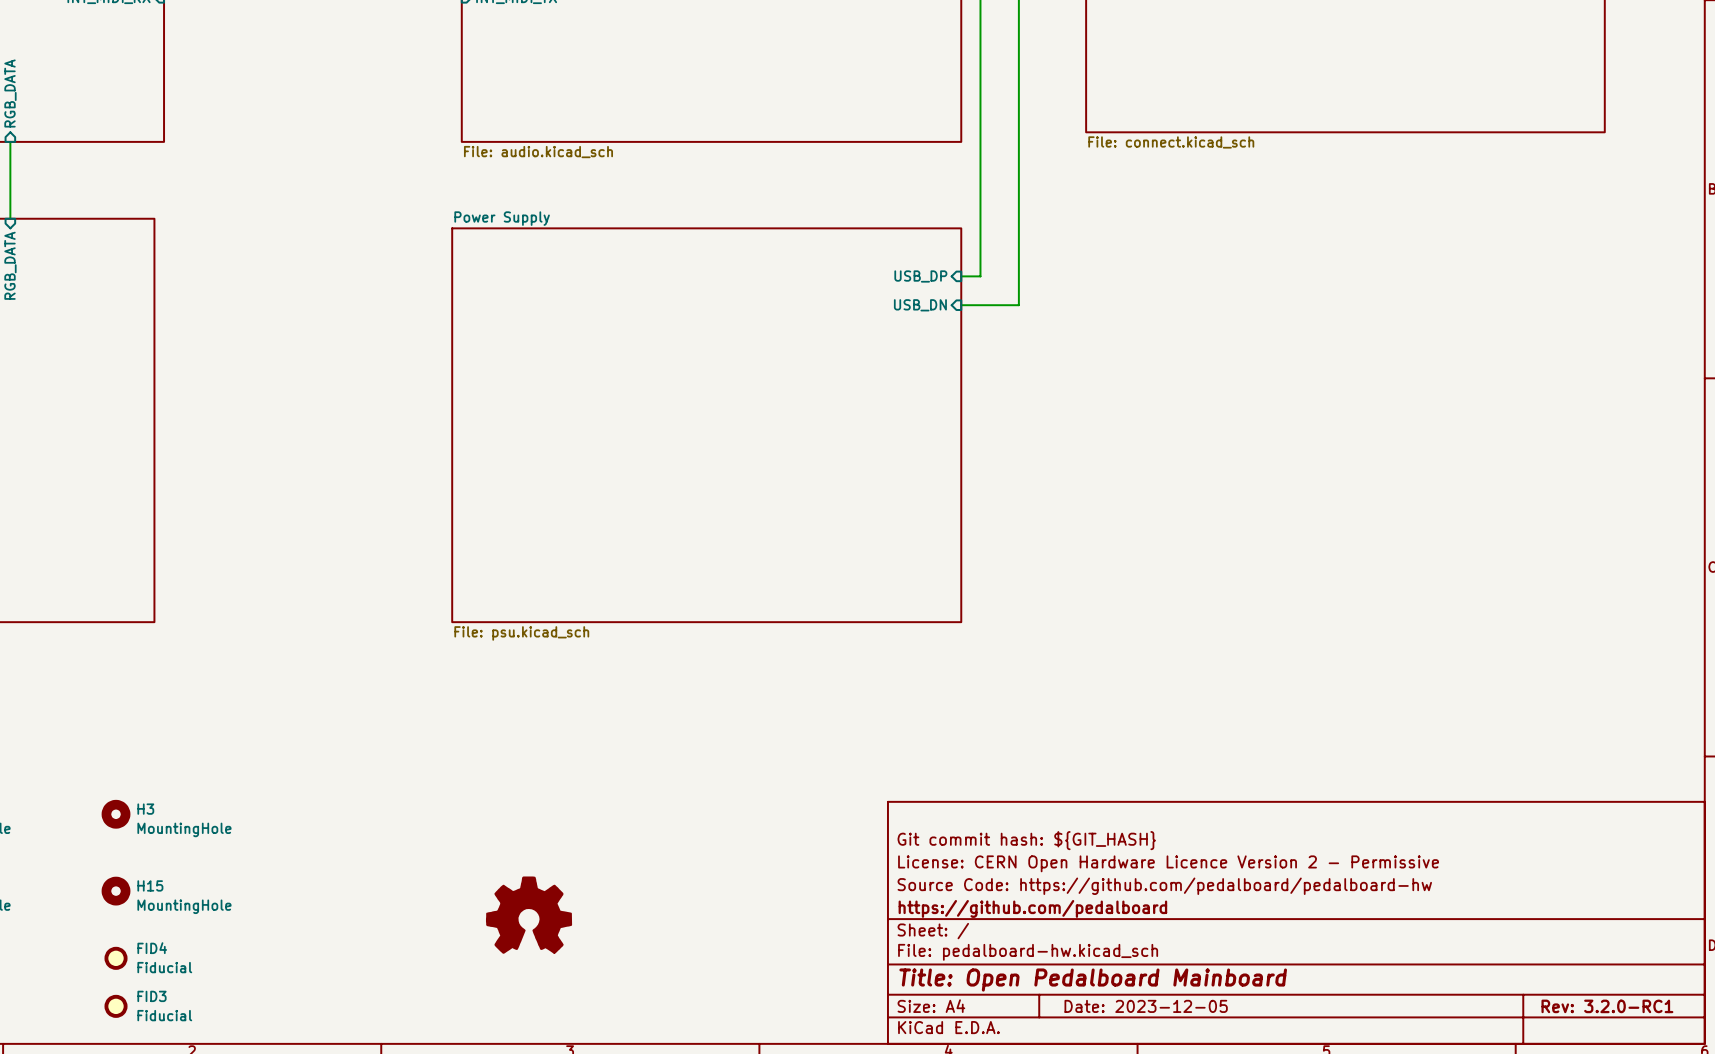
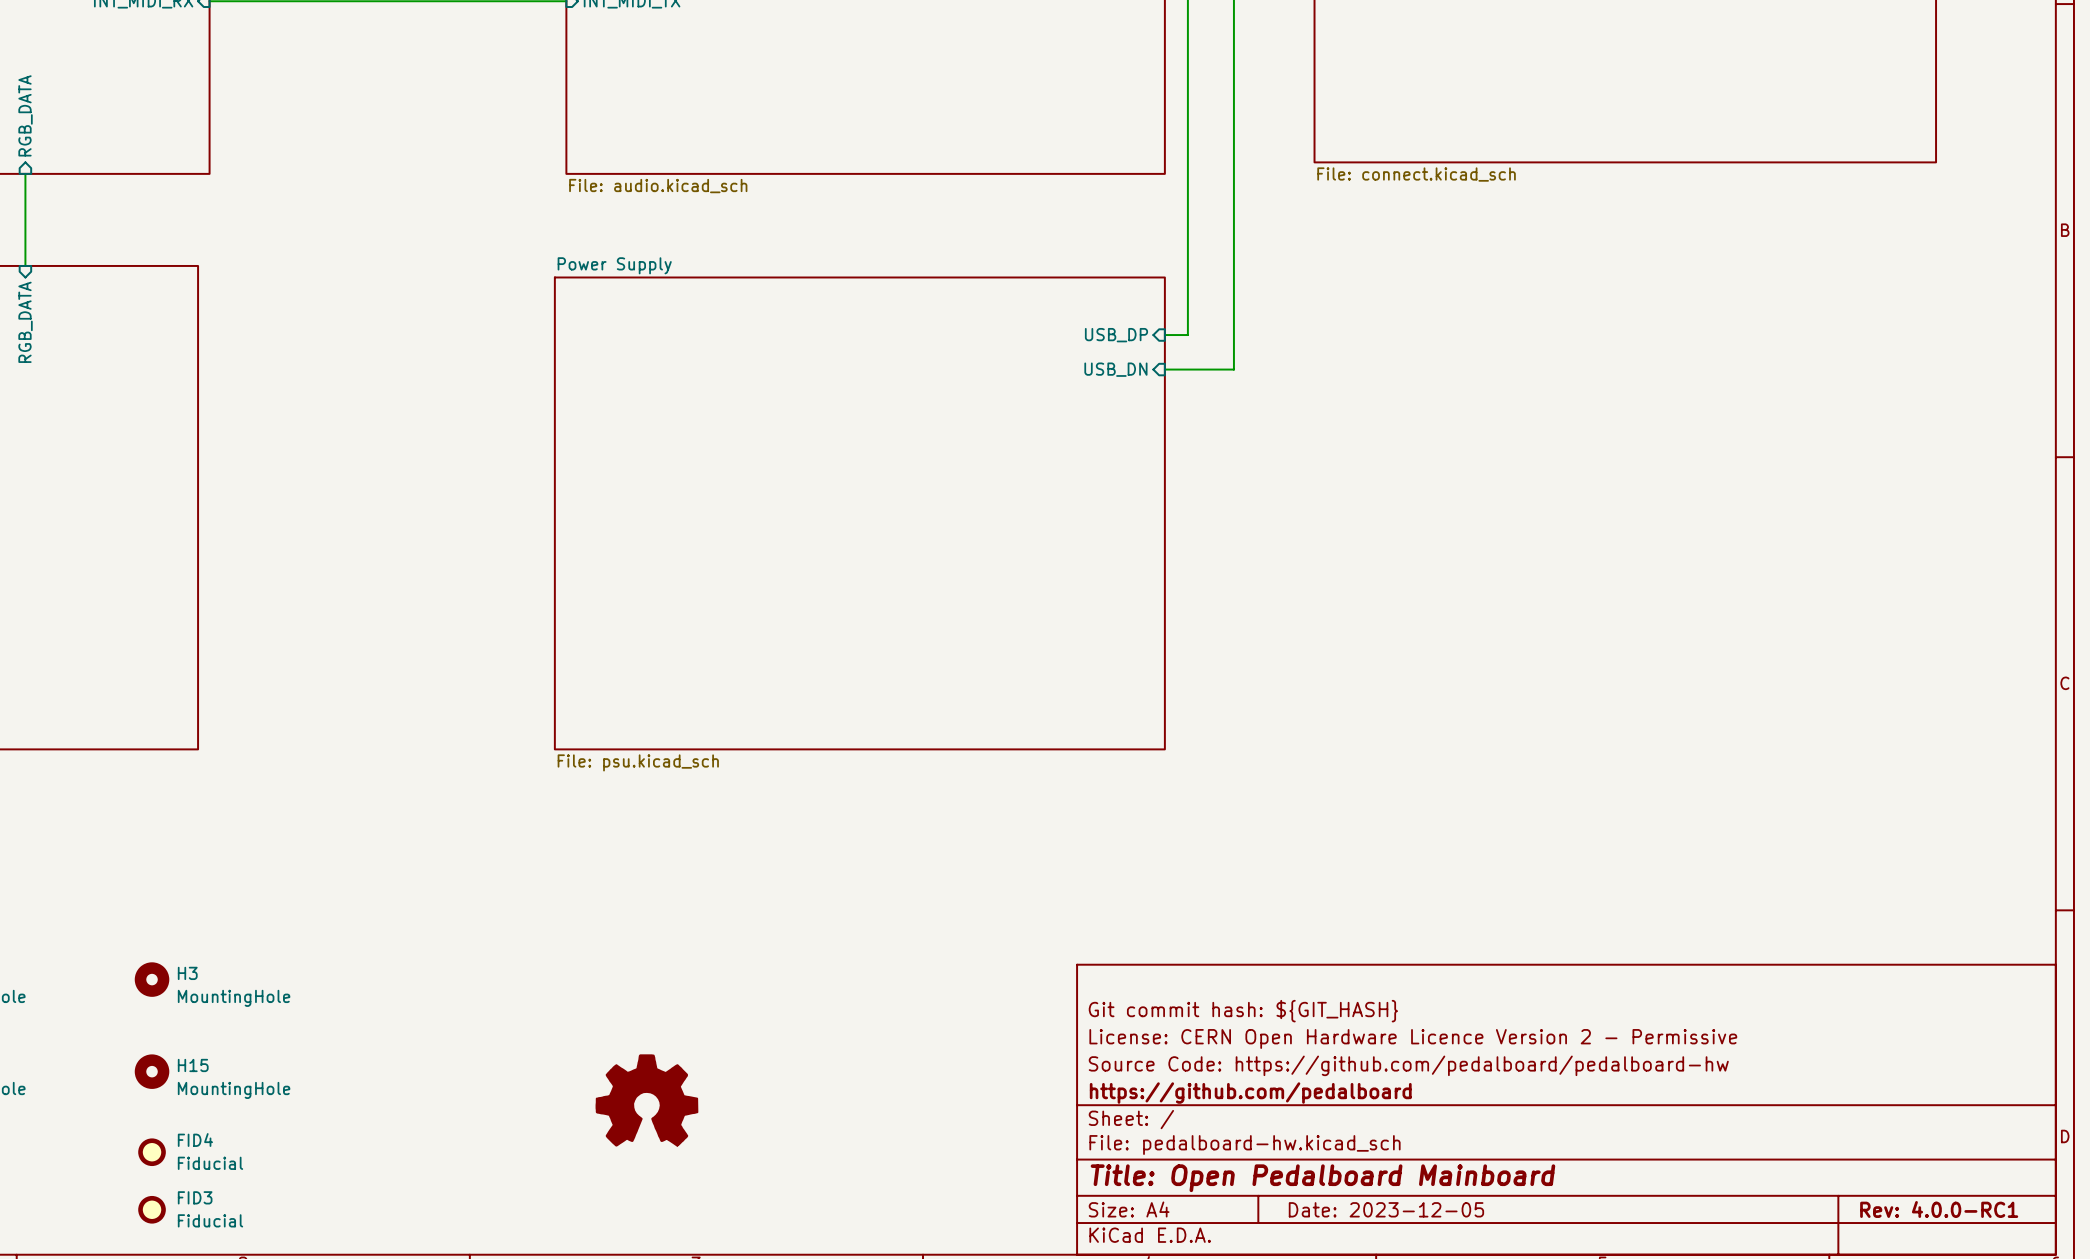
title block: Rev: 3.2.0-RC1 (1607, 1006) -> Rev: 4.0.0-RC1 (1939, 1209)

